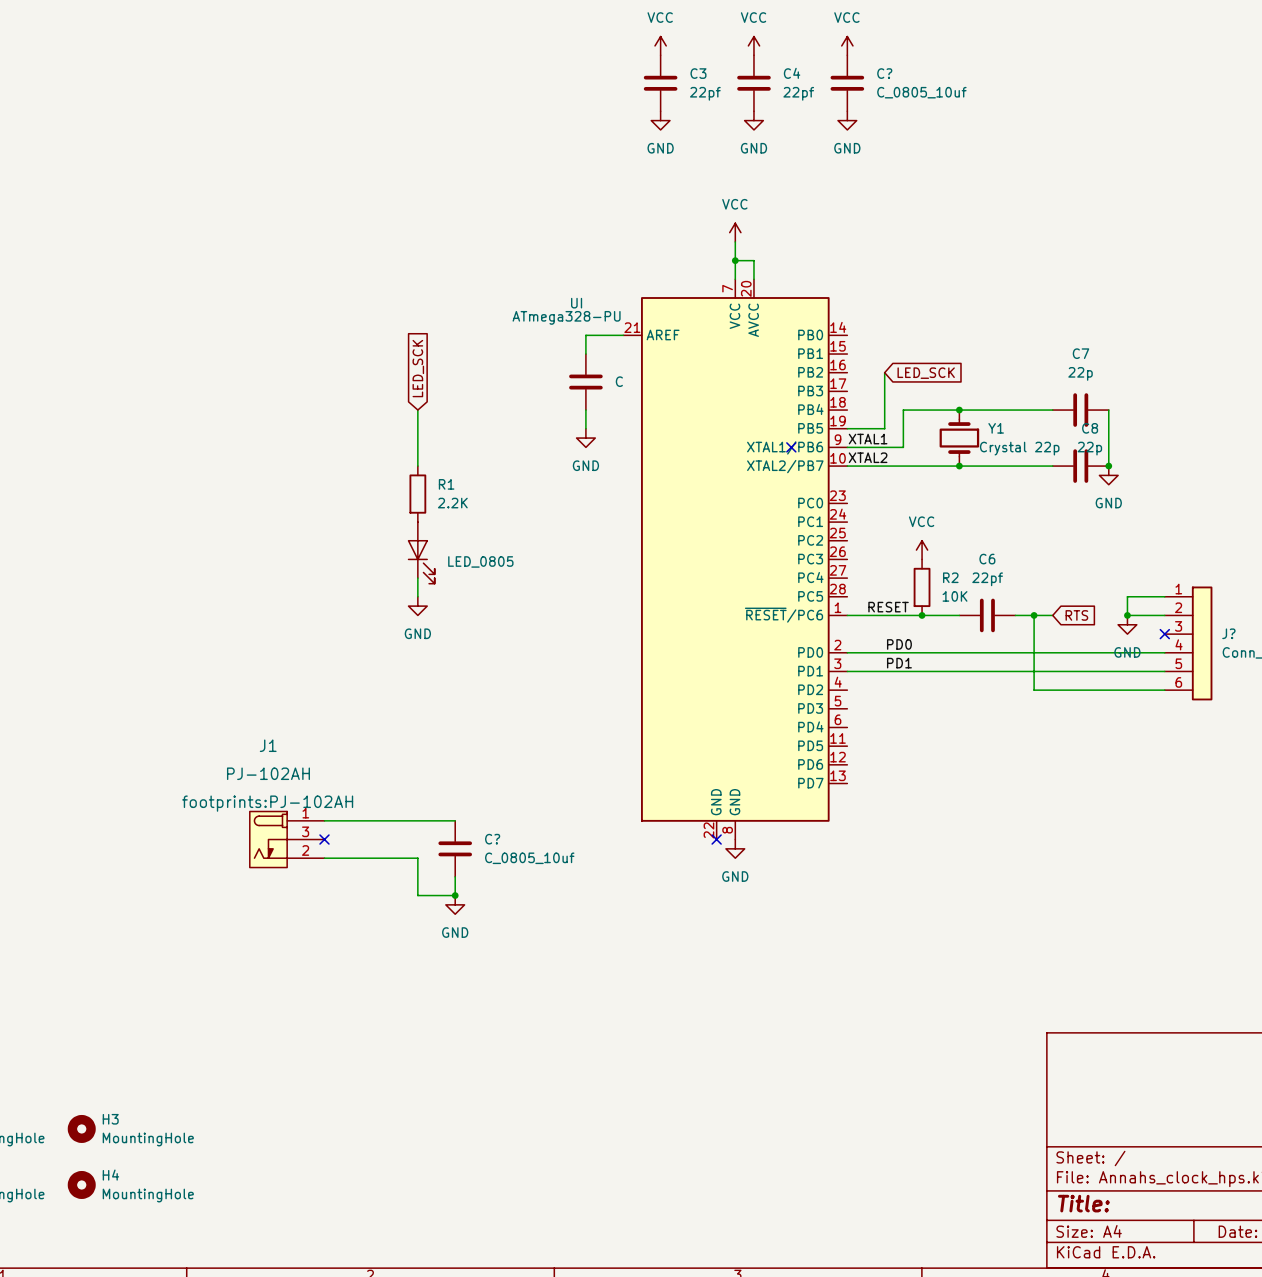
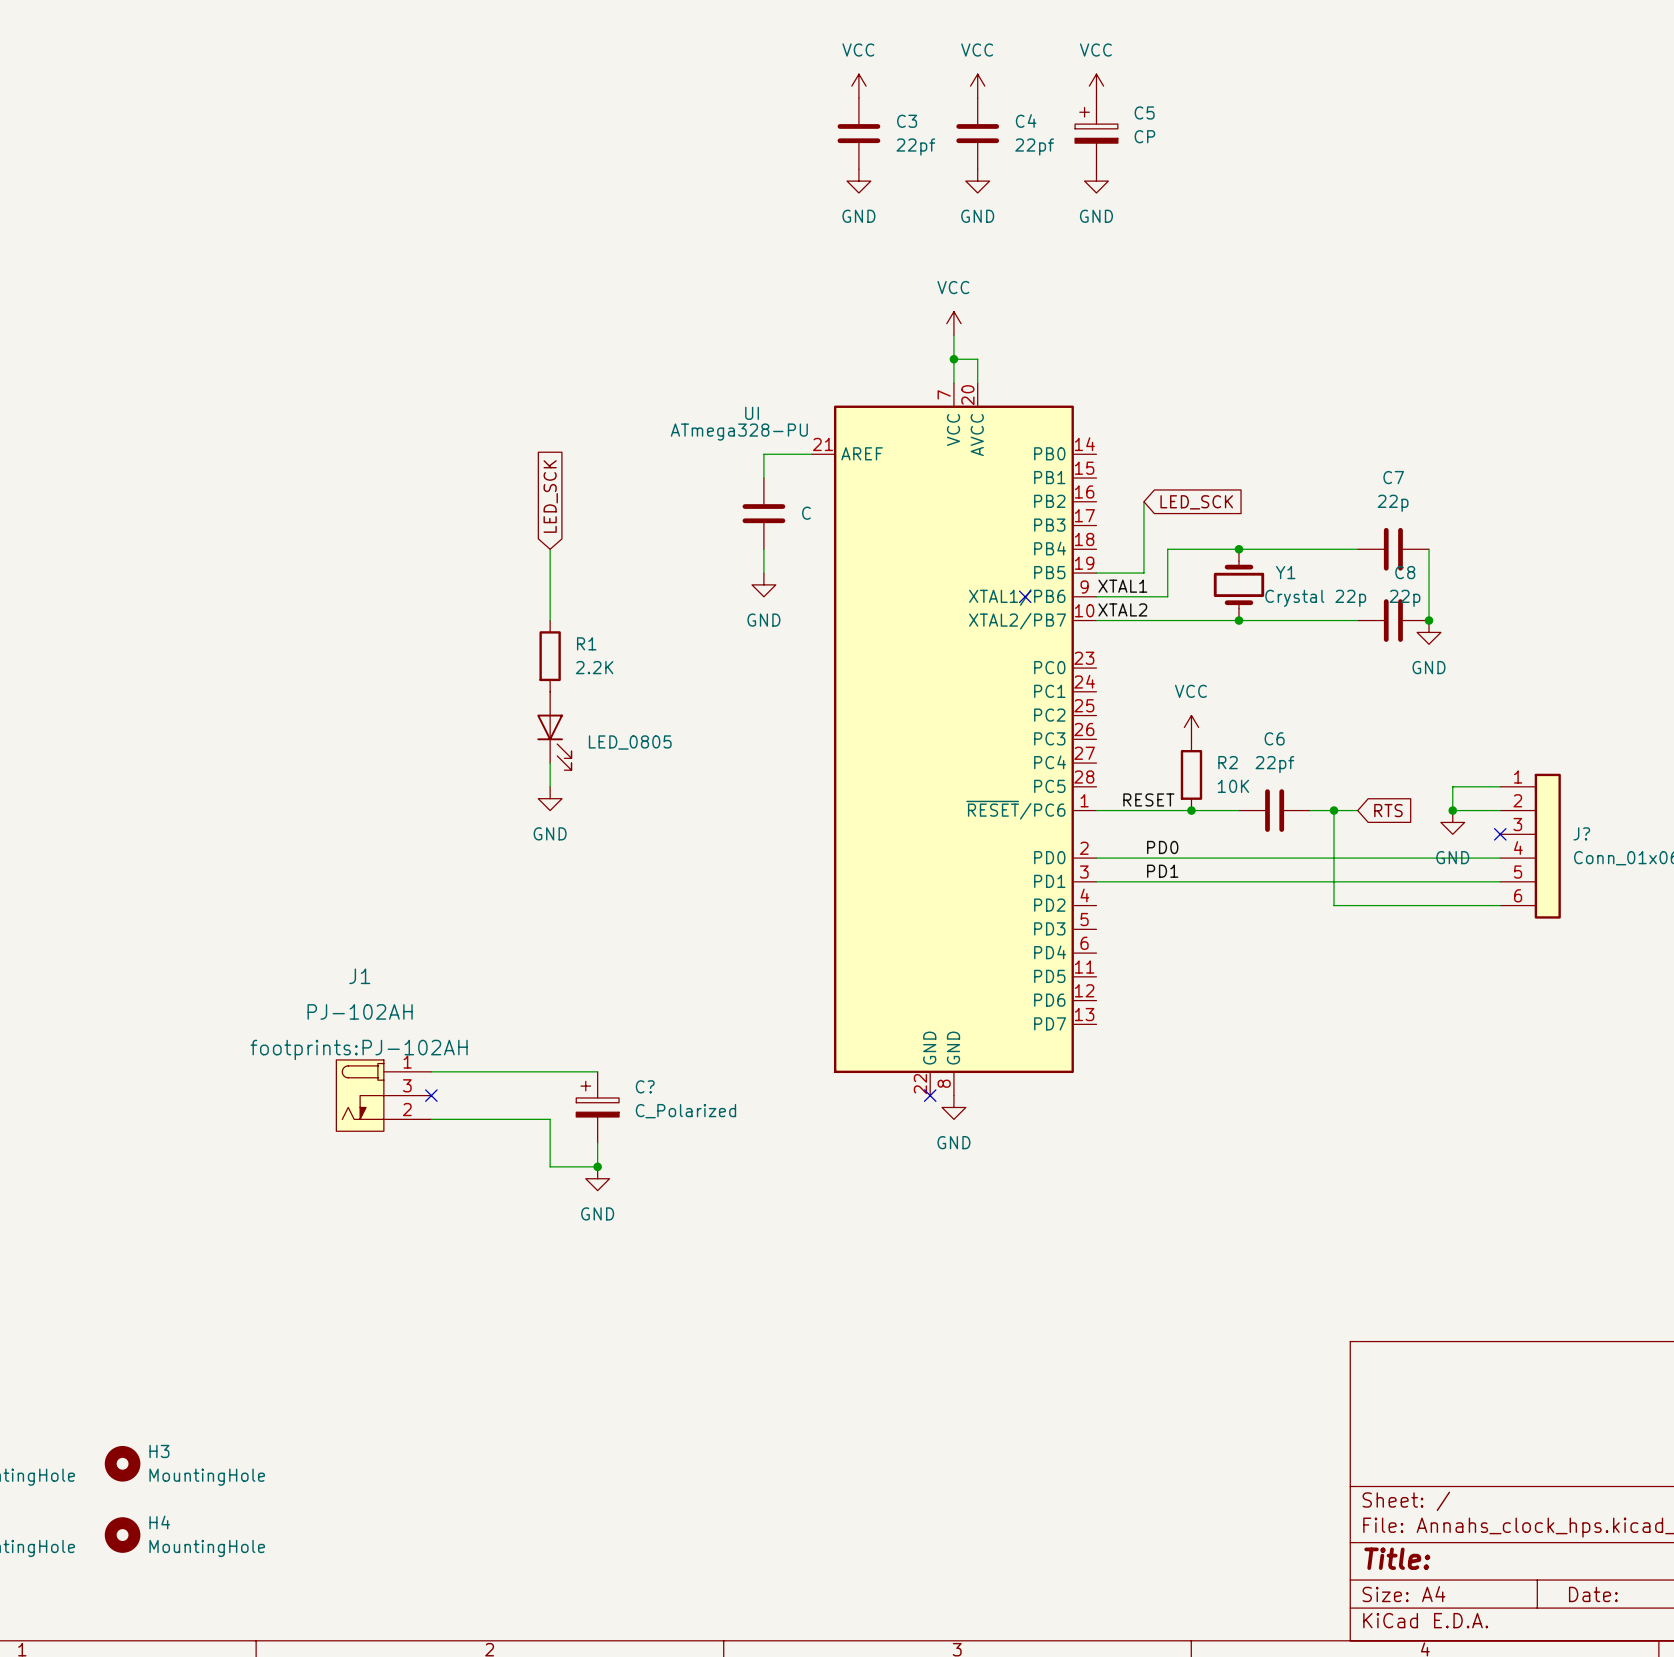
C?: C_0805_10uf (847, 83) -> none
C5: none -> CP (1096, 133)
C? symbol: [438, 820, 473, 877] -> [576, 1071, 620, 1144]
C? value: C_0805_10uf (529, 858) -> C_Polarized (685, 1111)

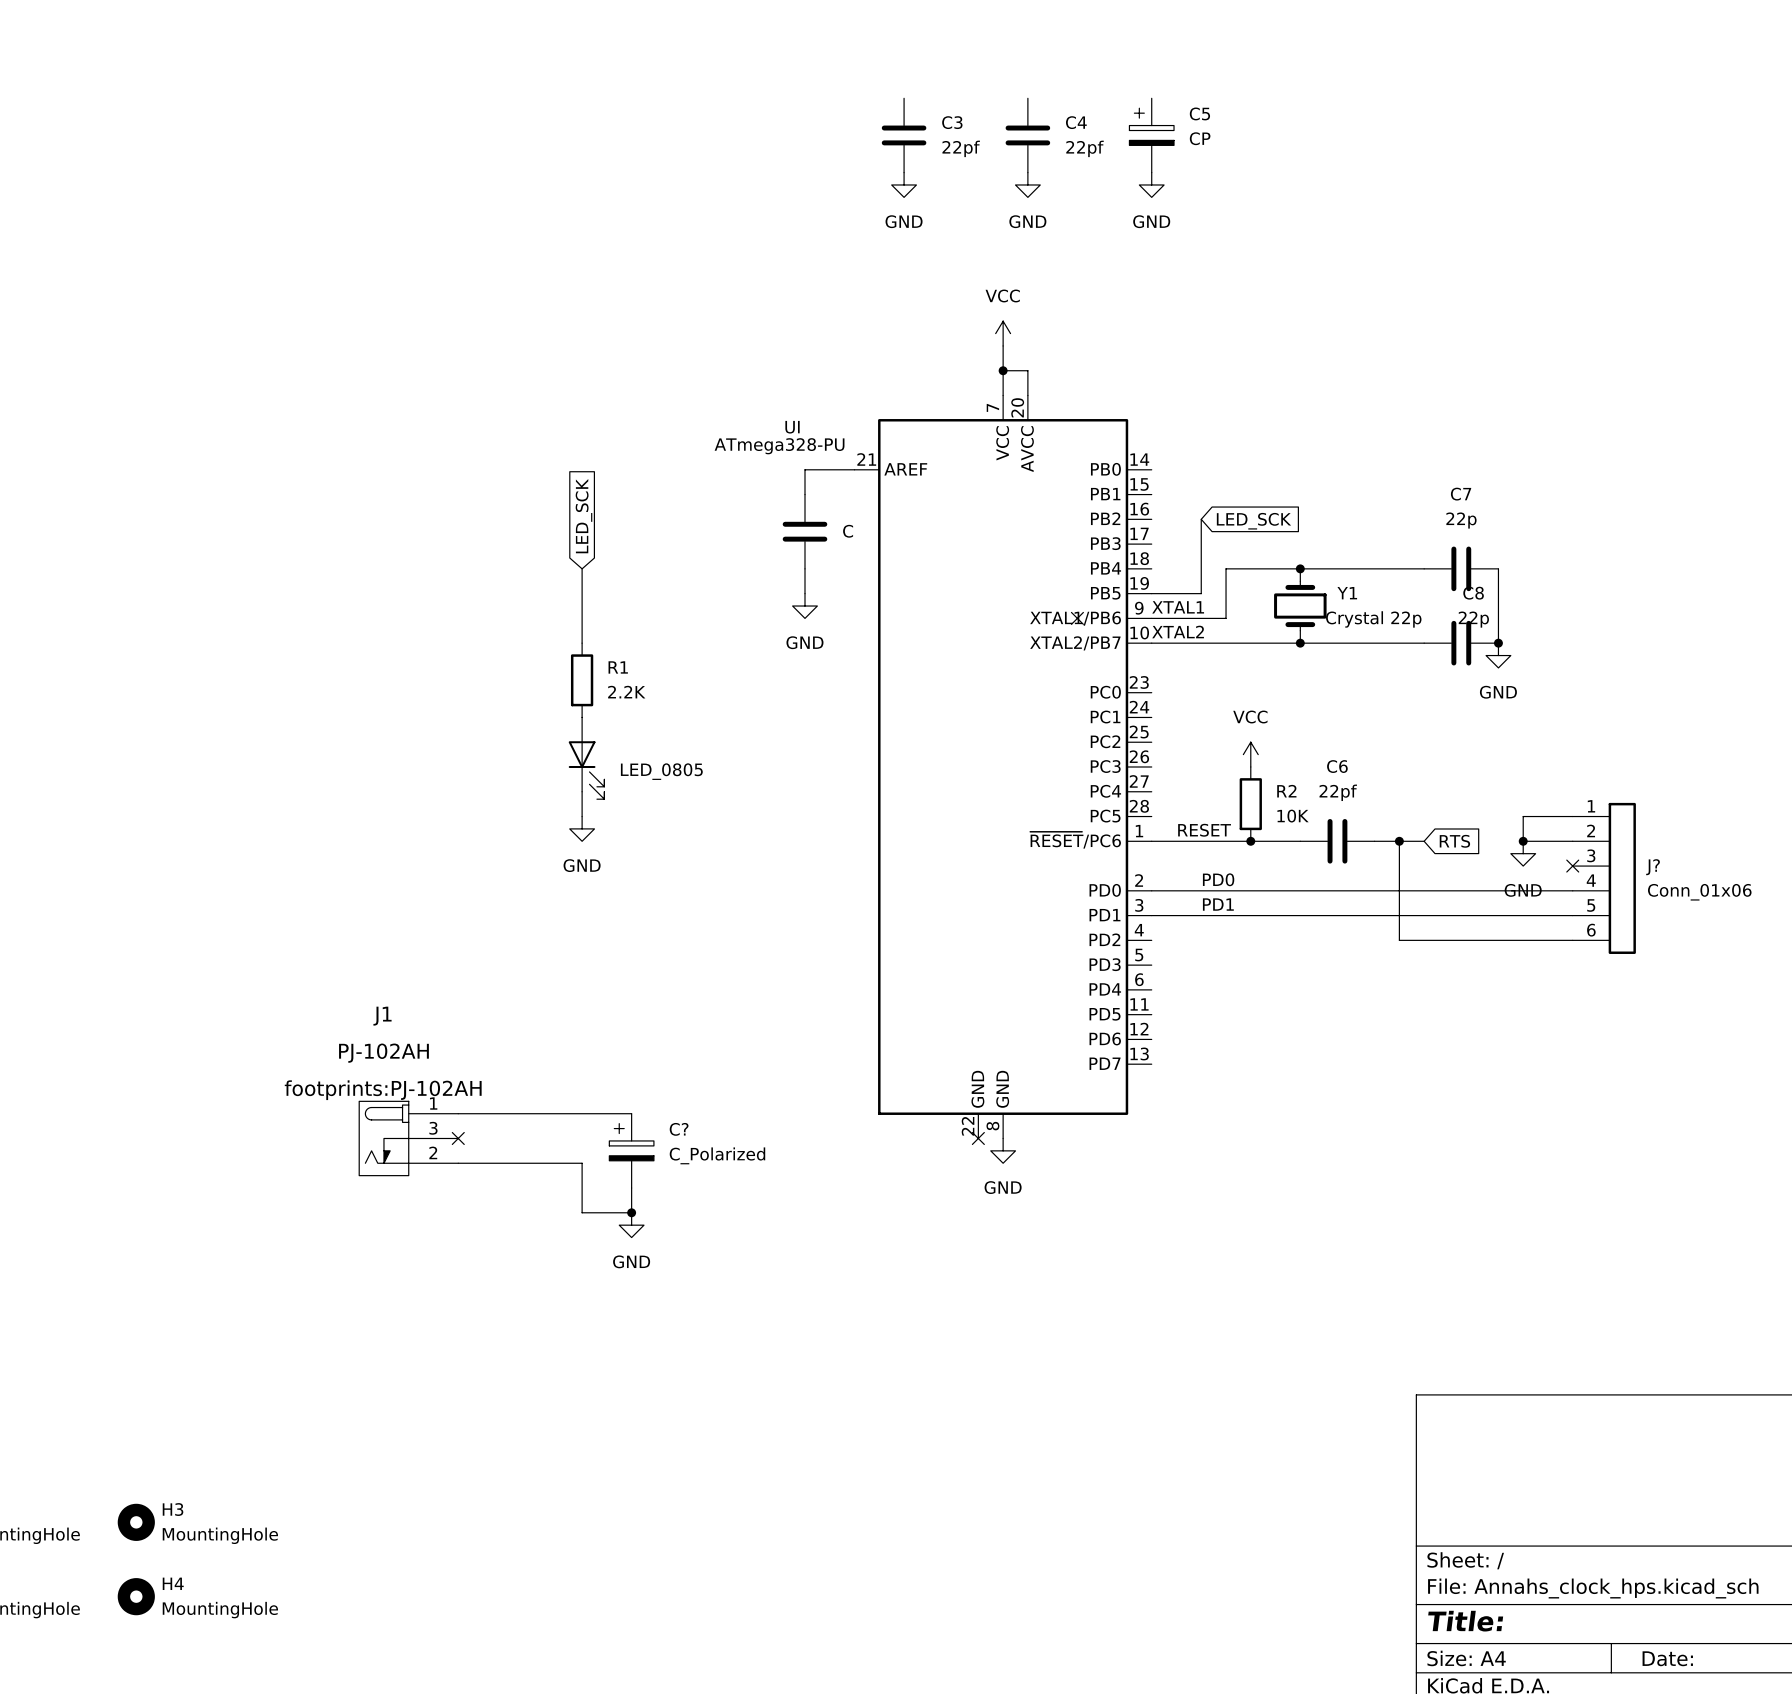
power symbol: VCC (858, 86) -> none
power symbol: VCC (977, 86) -> none
power symbol: VCC (1096, 86) -> none

